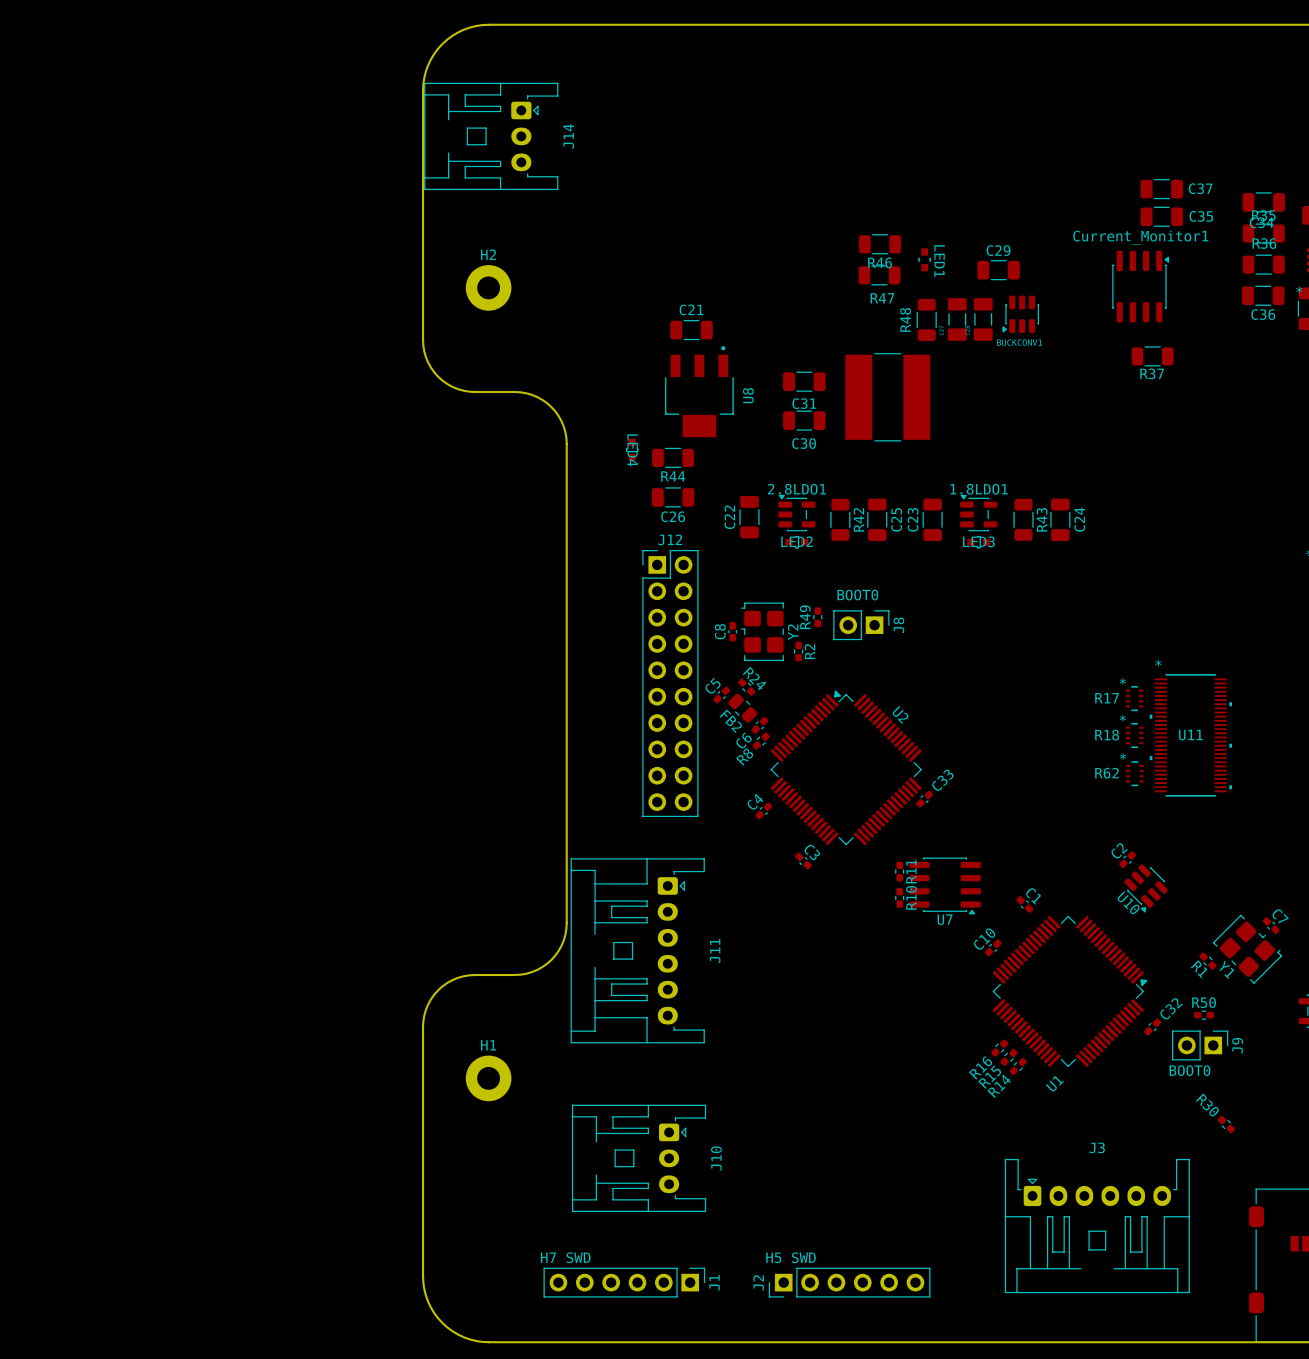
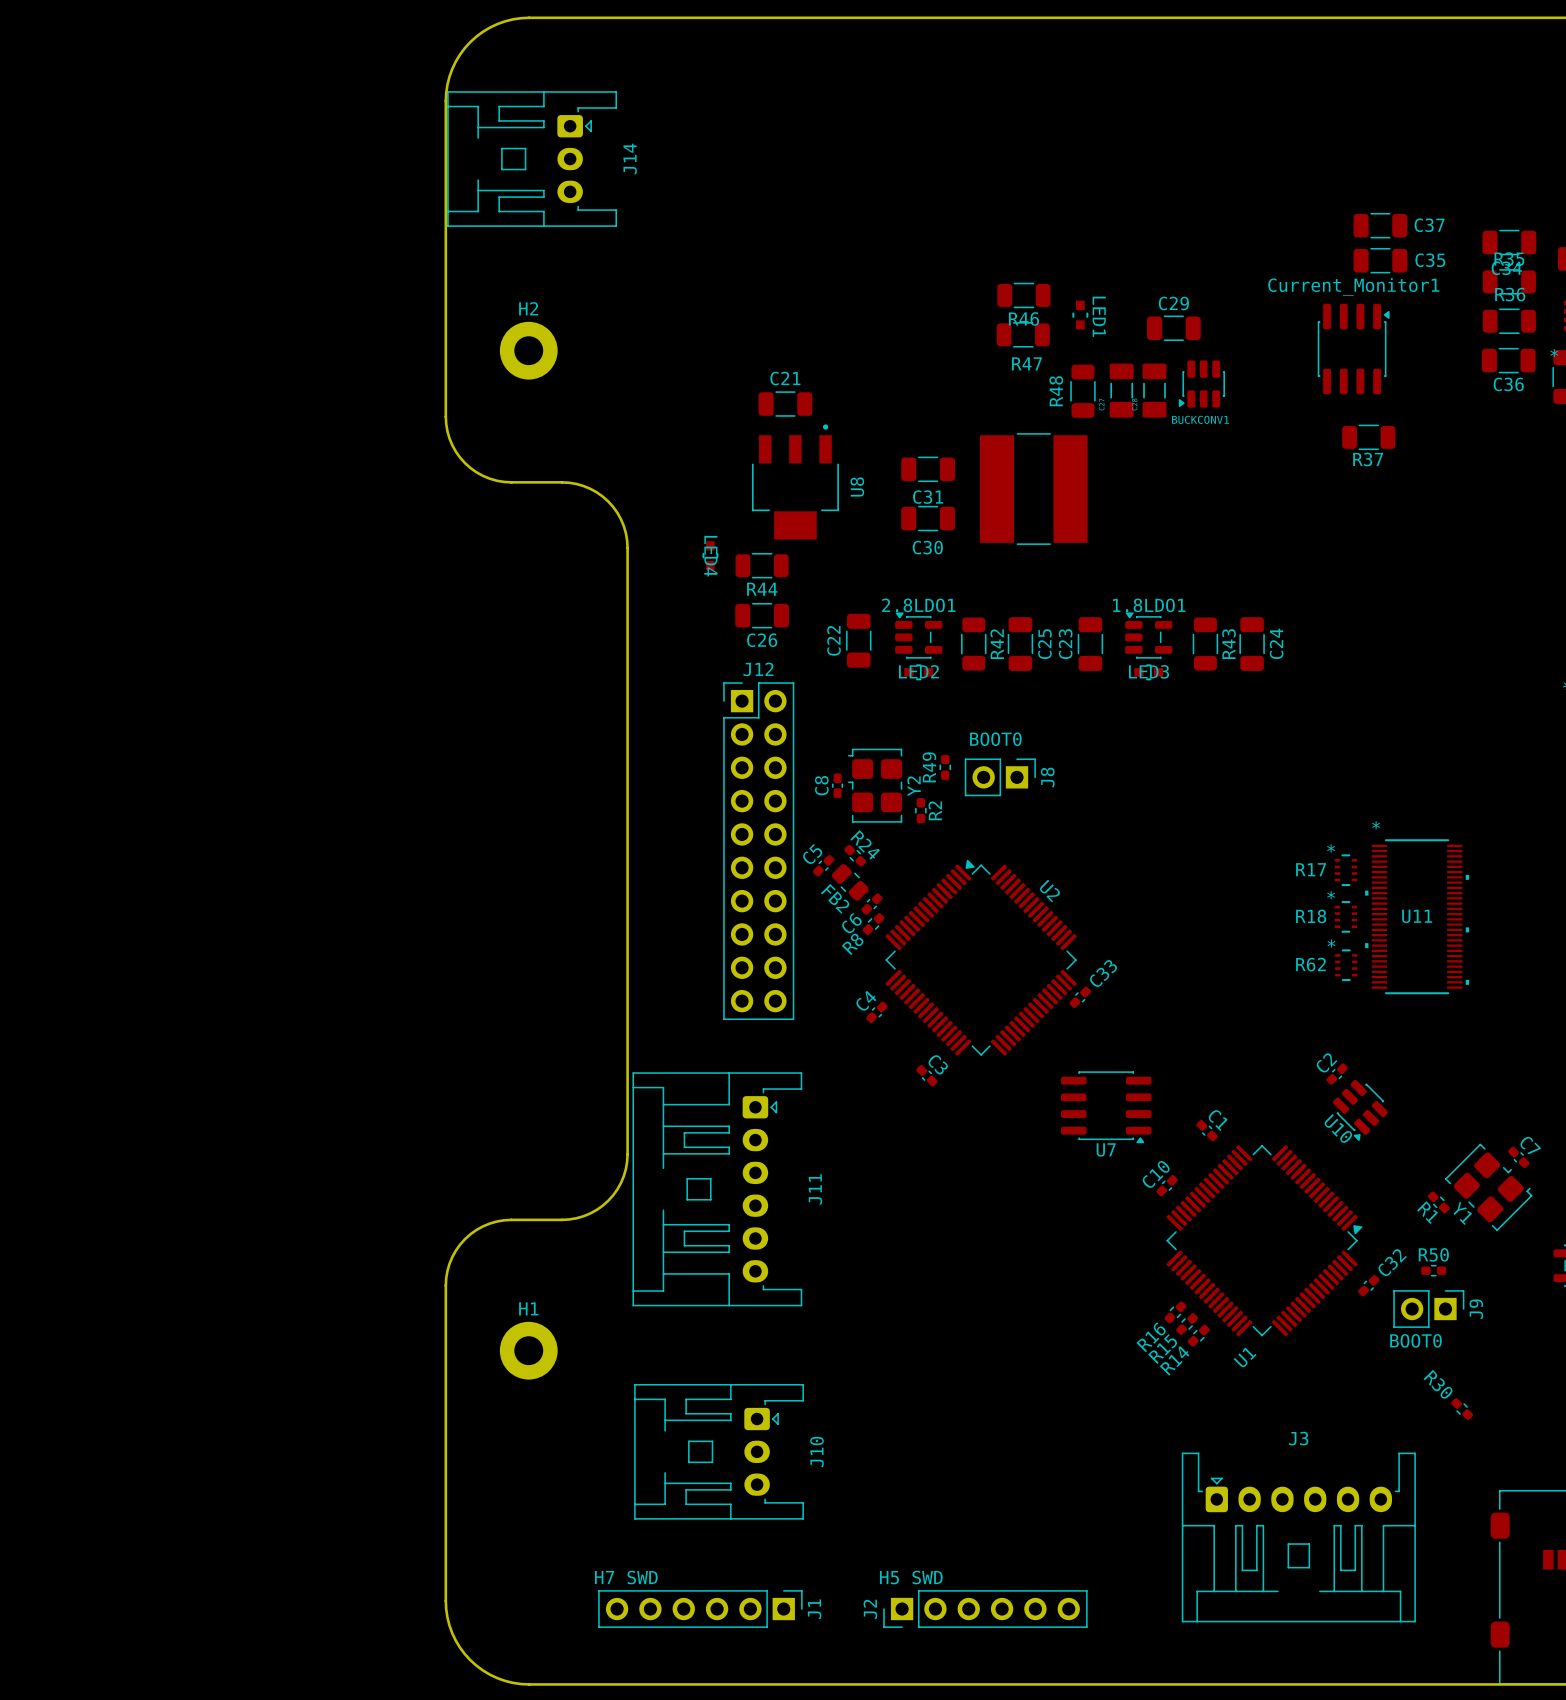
R11: (899, 871) -> none
R10: (899, 897) -> none

